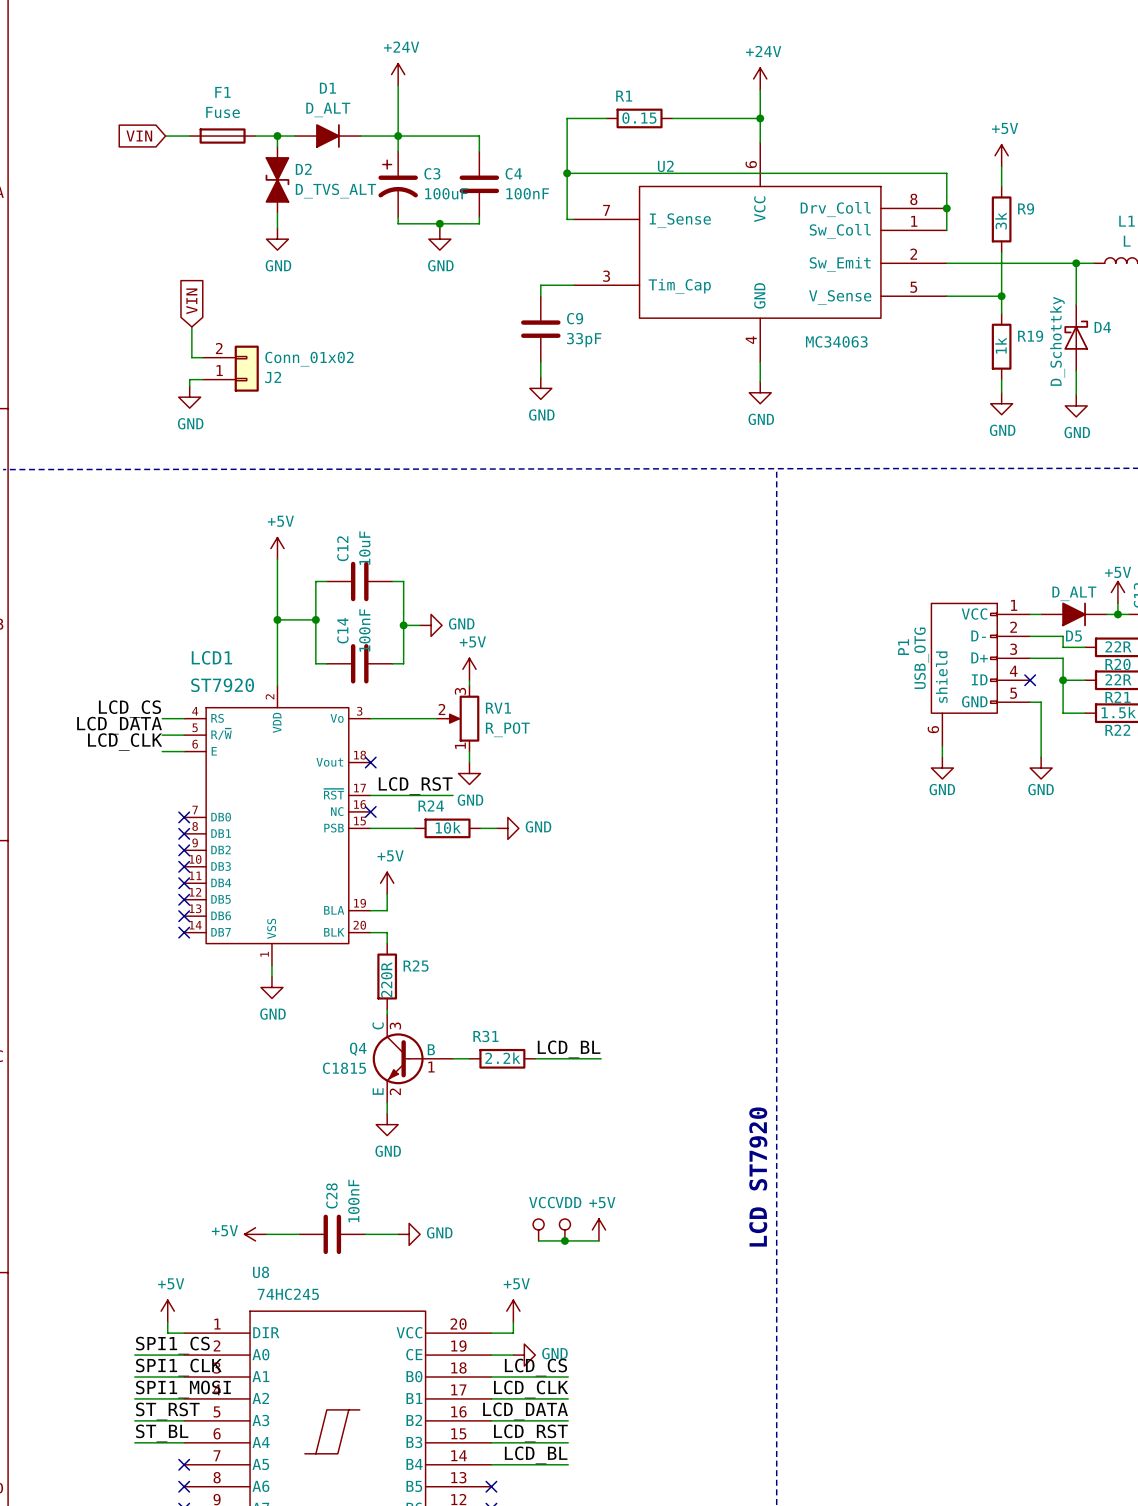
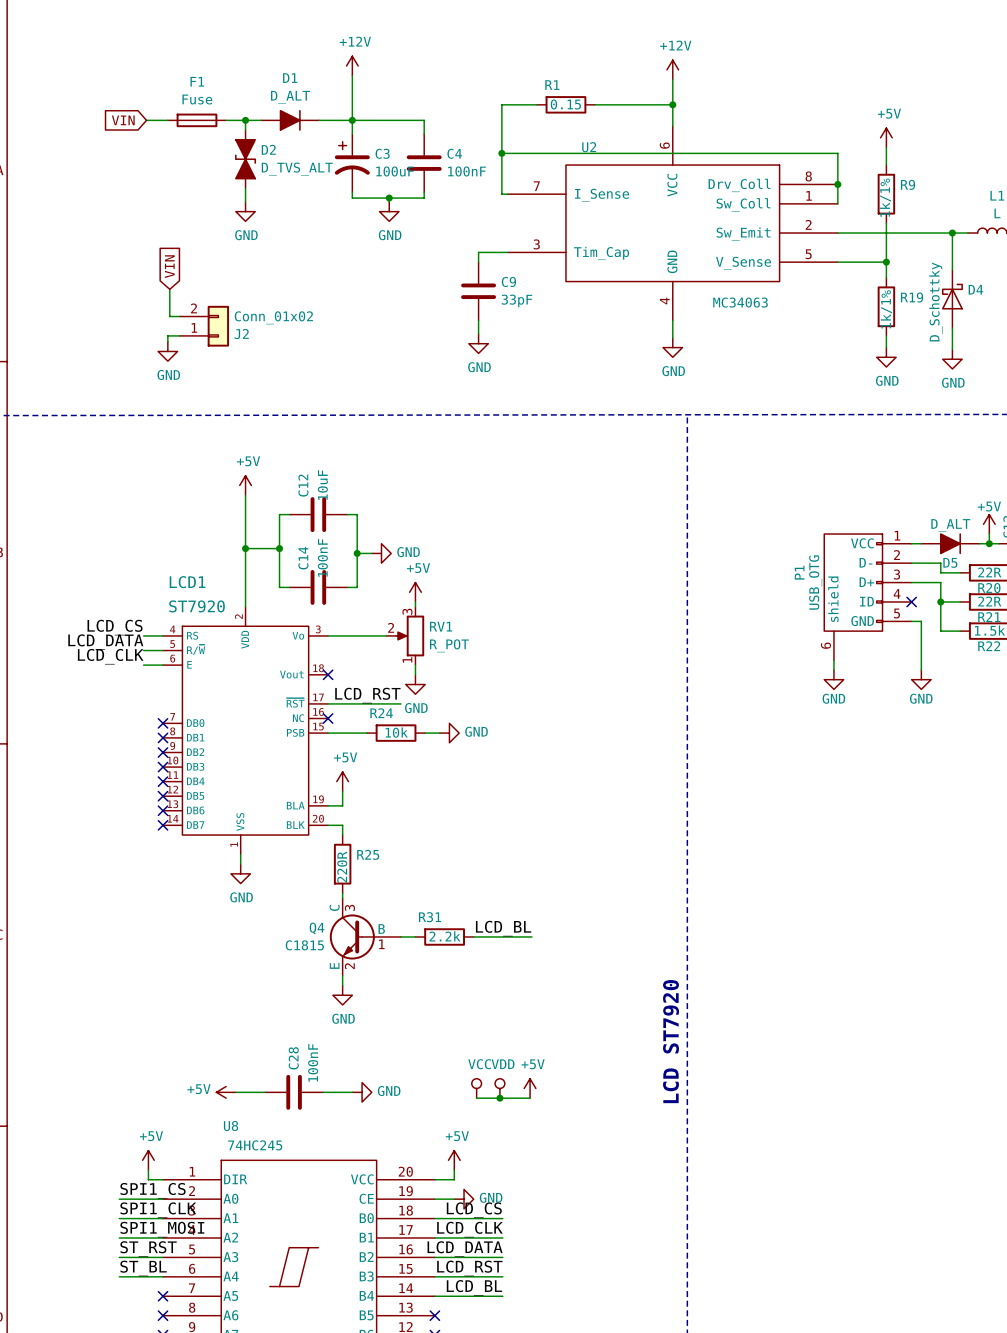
power symbol: +24V (398, 74) -> +12V (352, 66)
power symbol: +24V (760, 78) -> +12V (672, 69)
R9 value: 3k (1001, 220) -> 1k/1% (885, 197)
R19 value: 1k (1001, 345) -> 1k/1% (886, 309)

